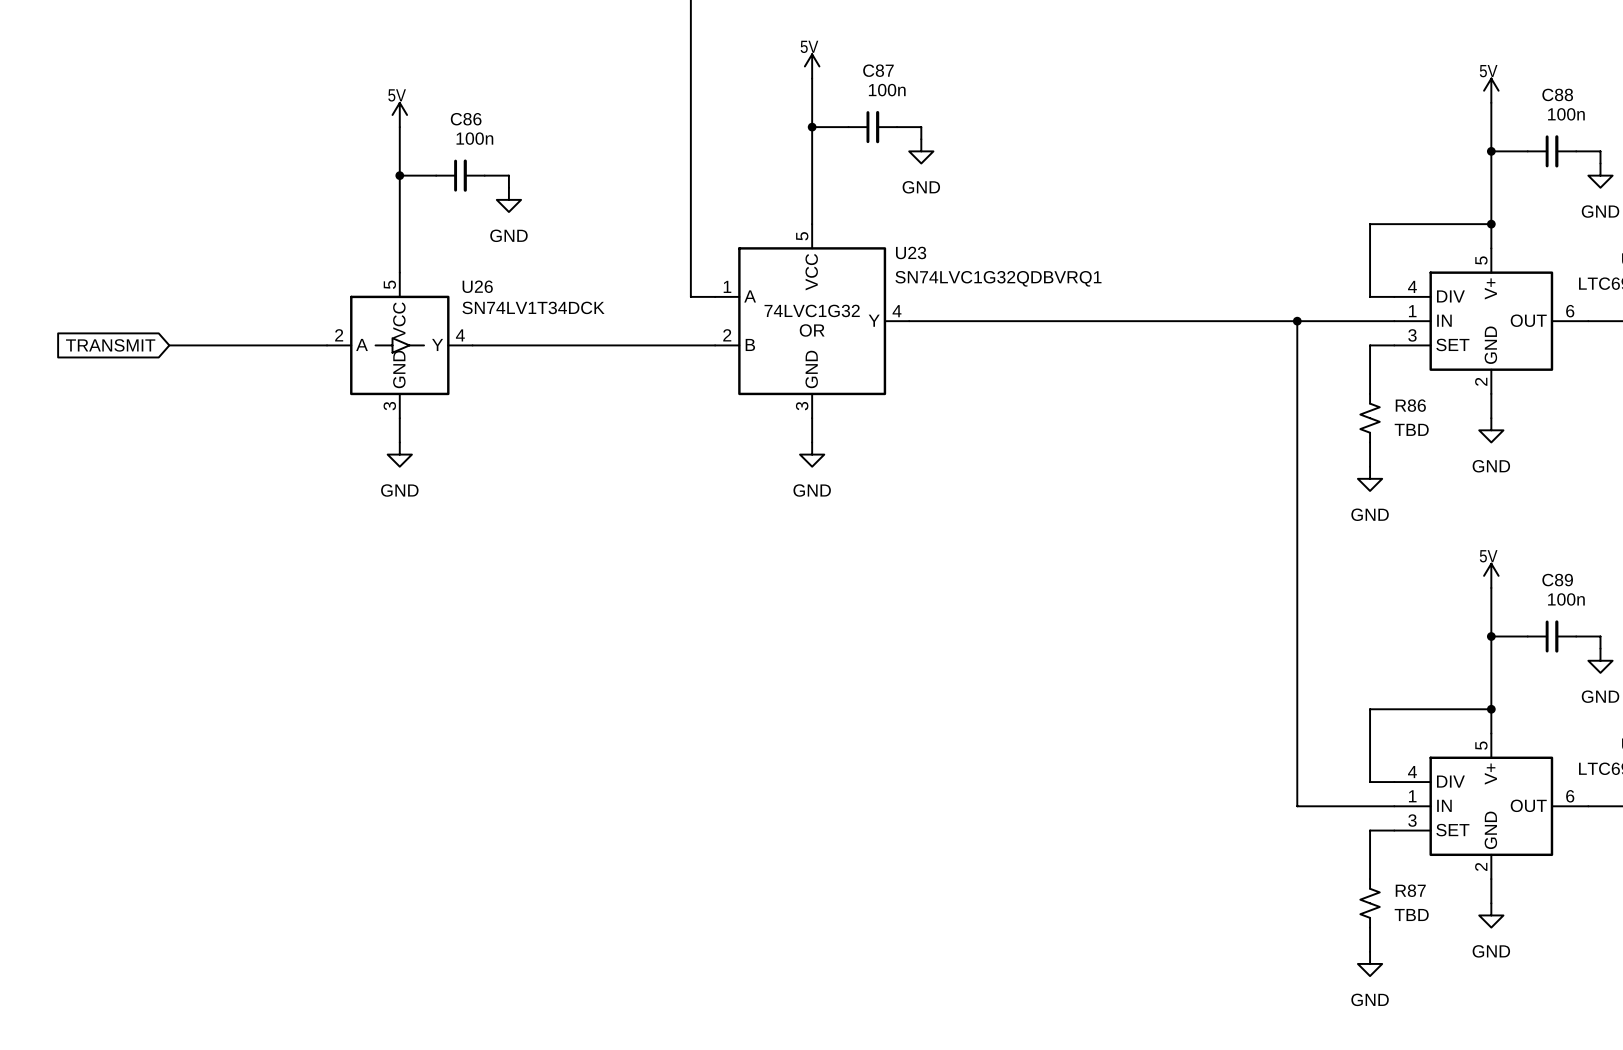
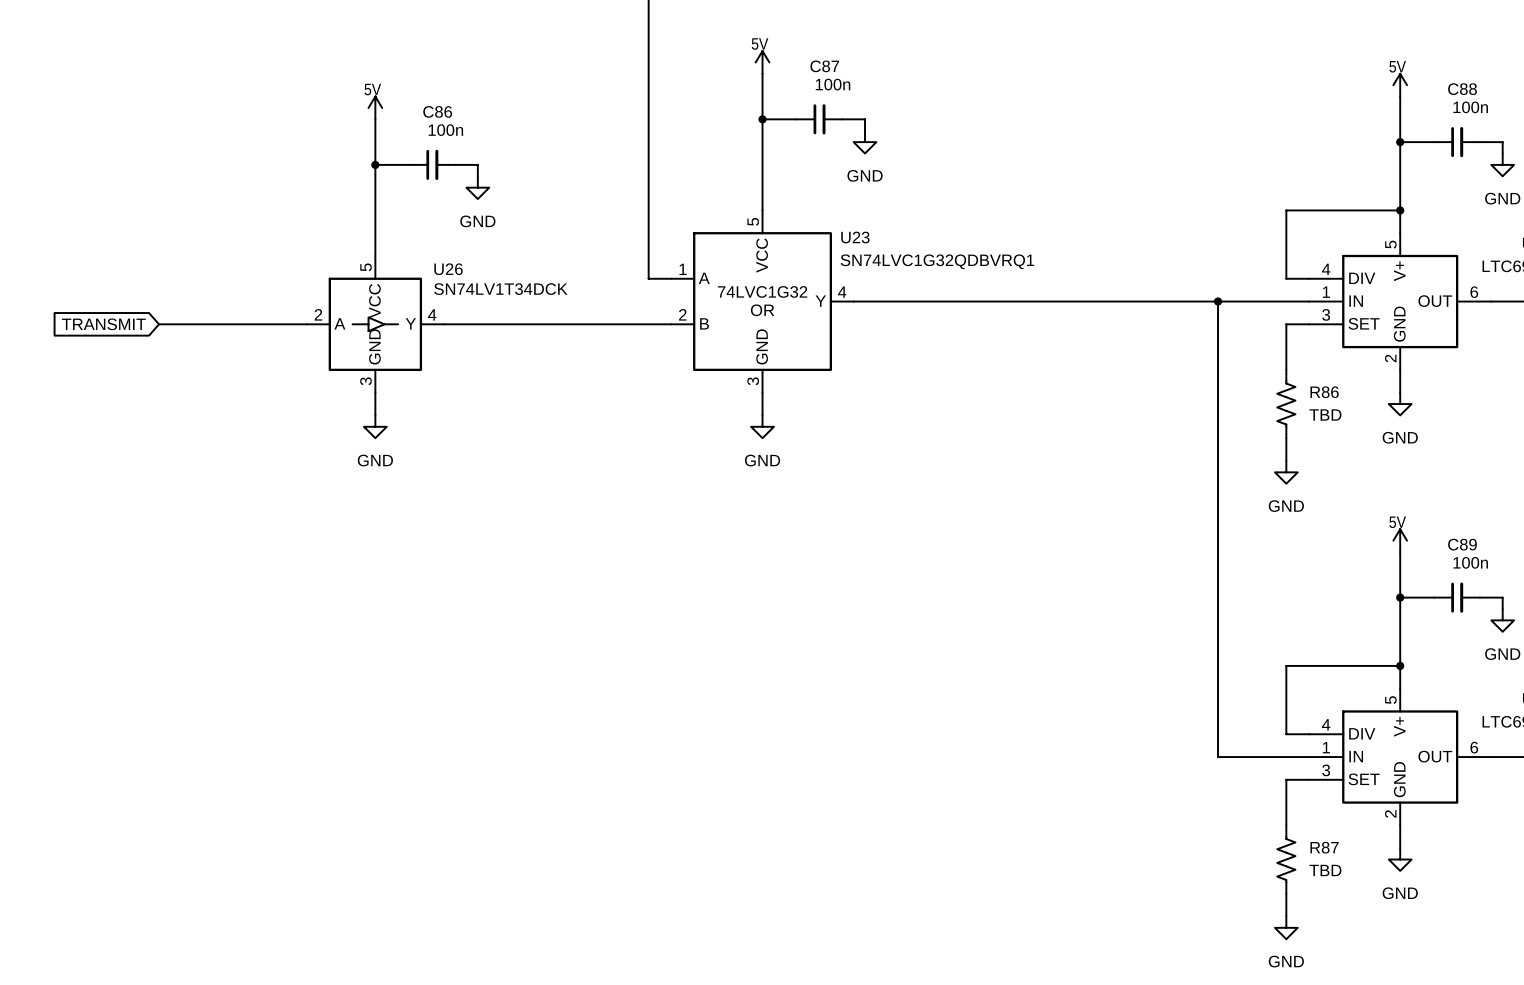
R86 symbol: [1360, 393, 1380, 443] -> [1277, 369, 1296, 439]
power symbol position: GND (1370, 478) -> GND (1286, 472)
R87 symbol: [1360, 879, 1380, 928] -> [1277, 825, 1296, 894]
power symbol position: GND (1370, 963) -> GND (1286, 927)

